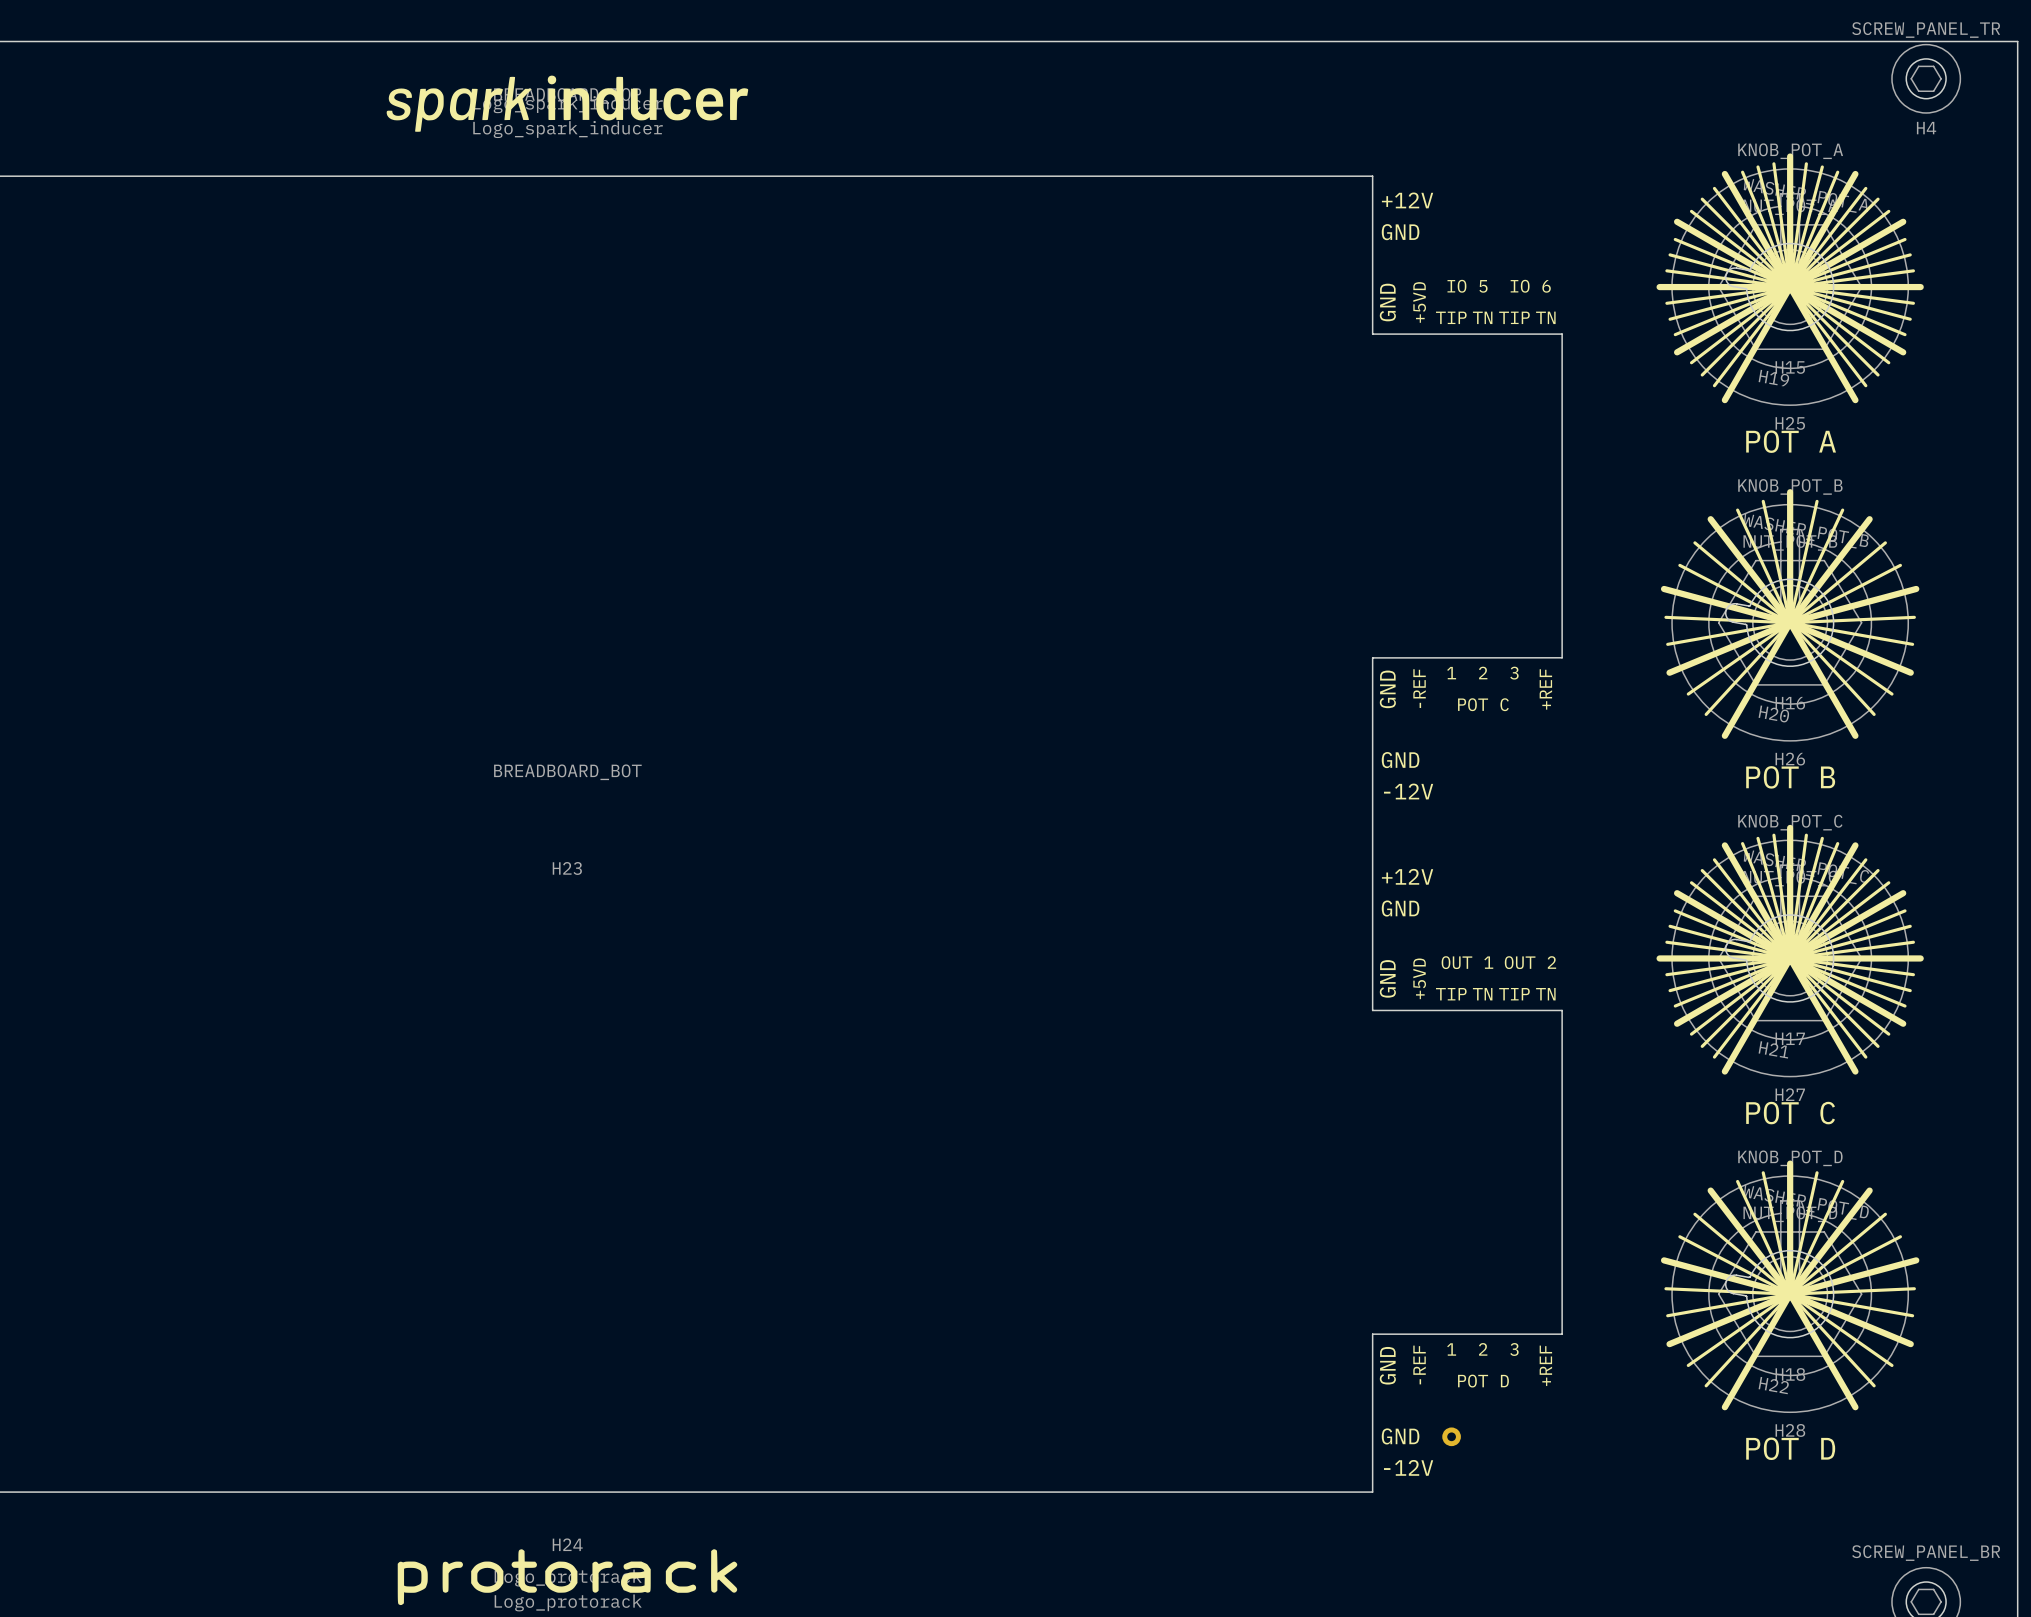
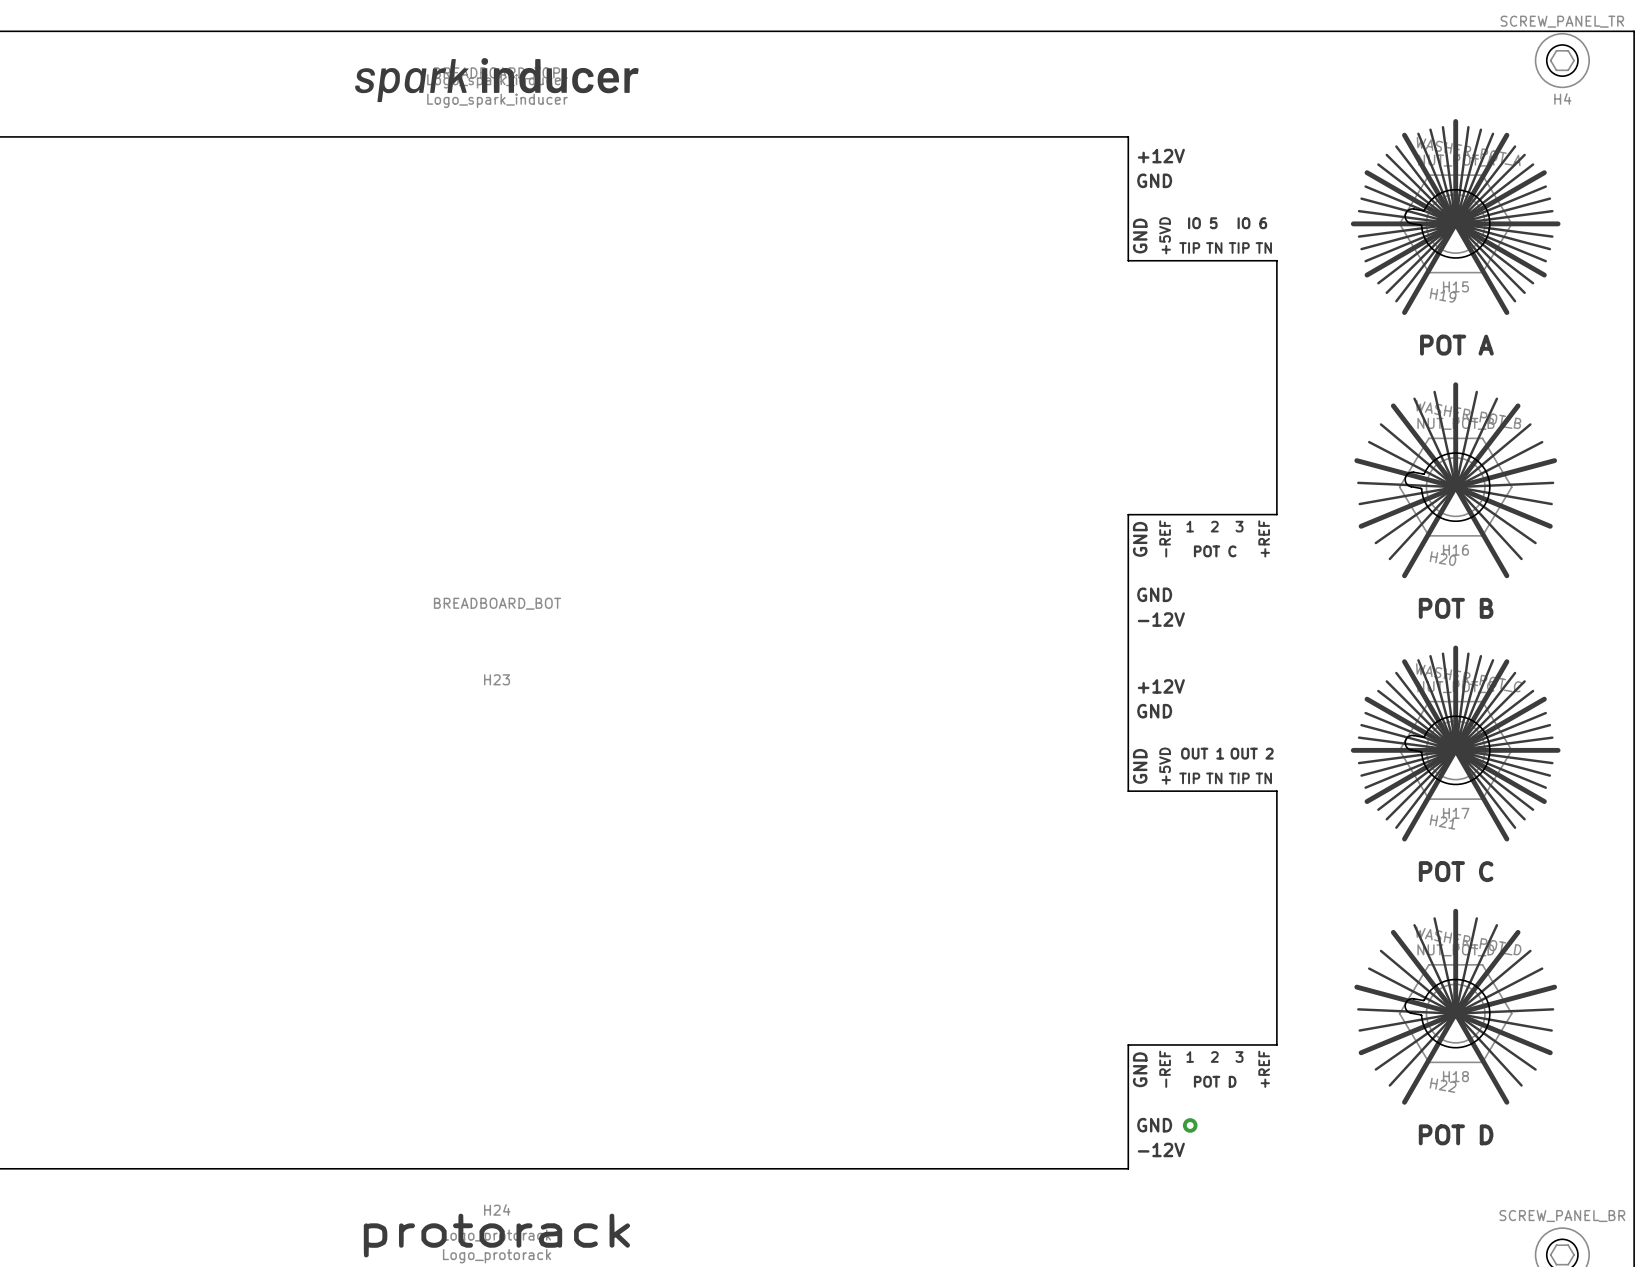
H25: KNOB_POT_A (1790, 287) -> none
H26: KNOB_POT_B (1790, 622) -> none
H27: KNOB_POT_C (1790, 958) -> none
H28: KNOB_POT_D (1790, 1294) -> none

